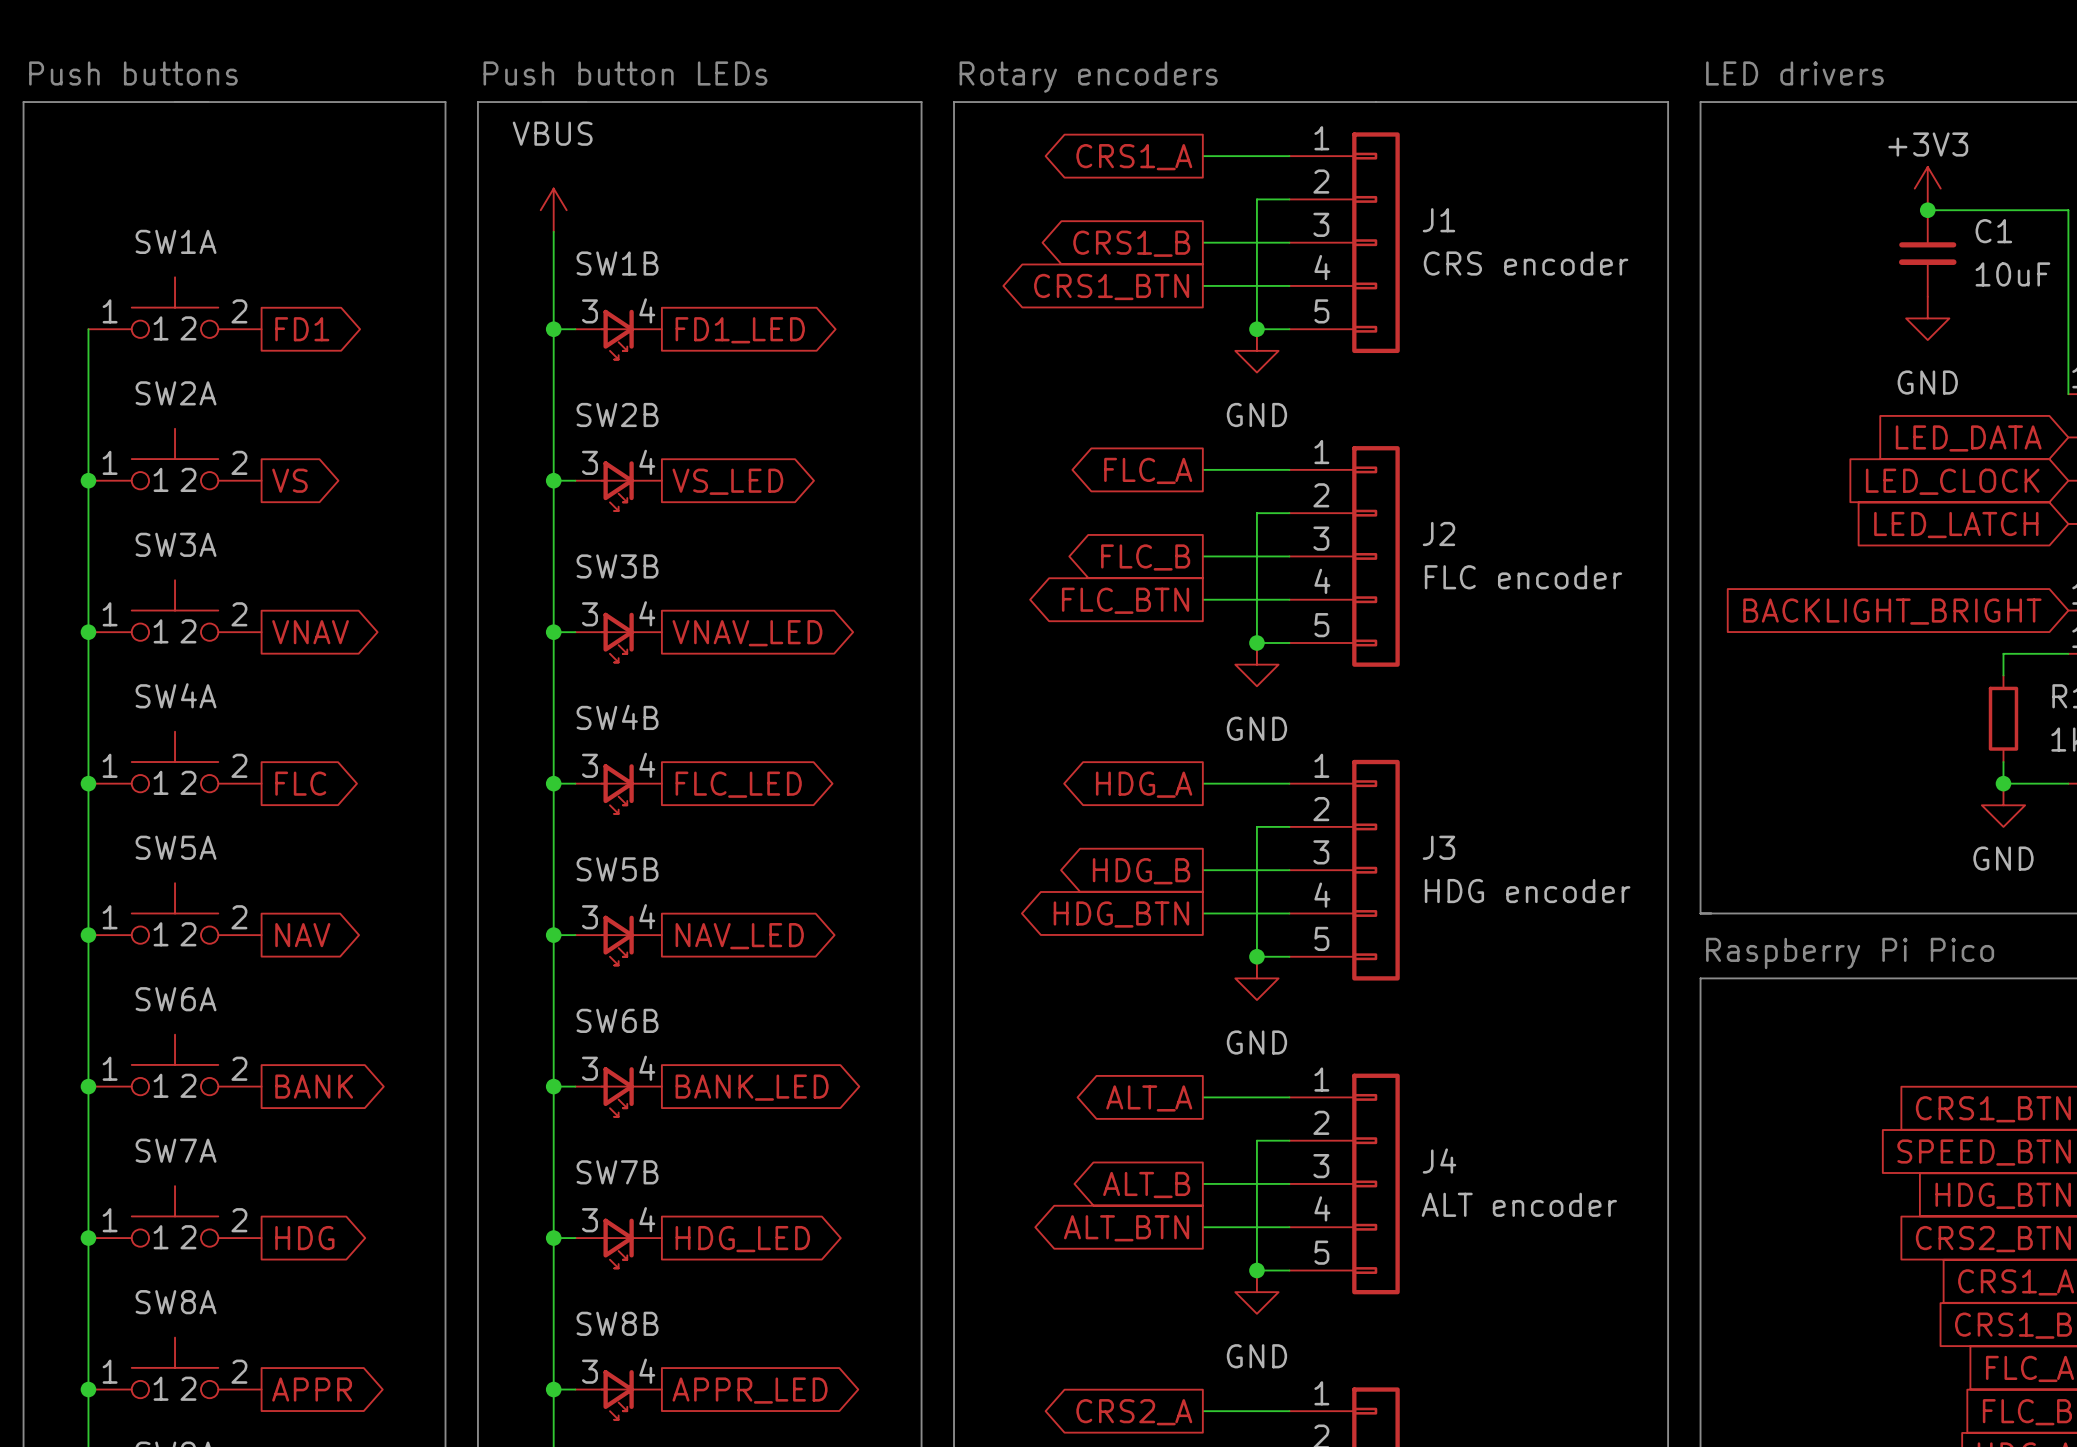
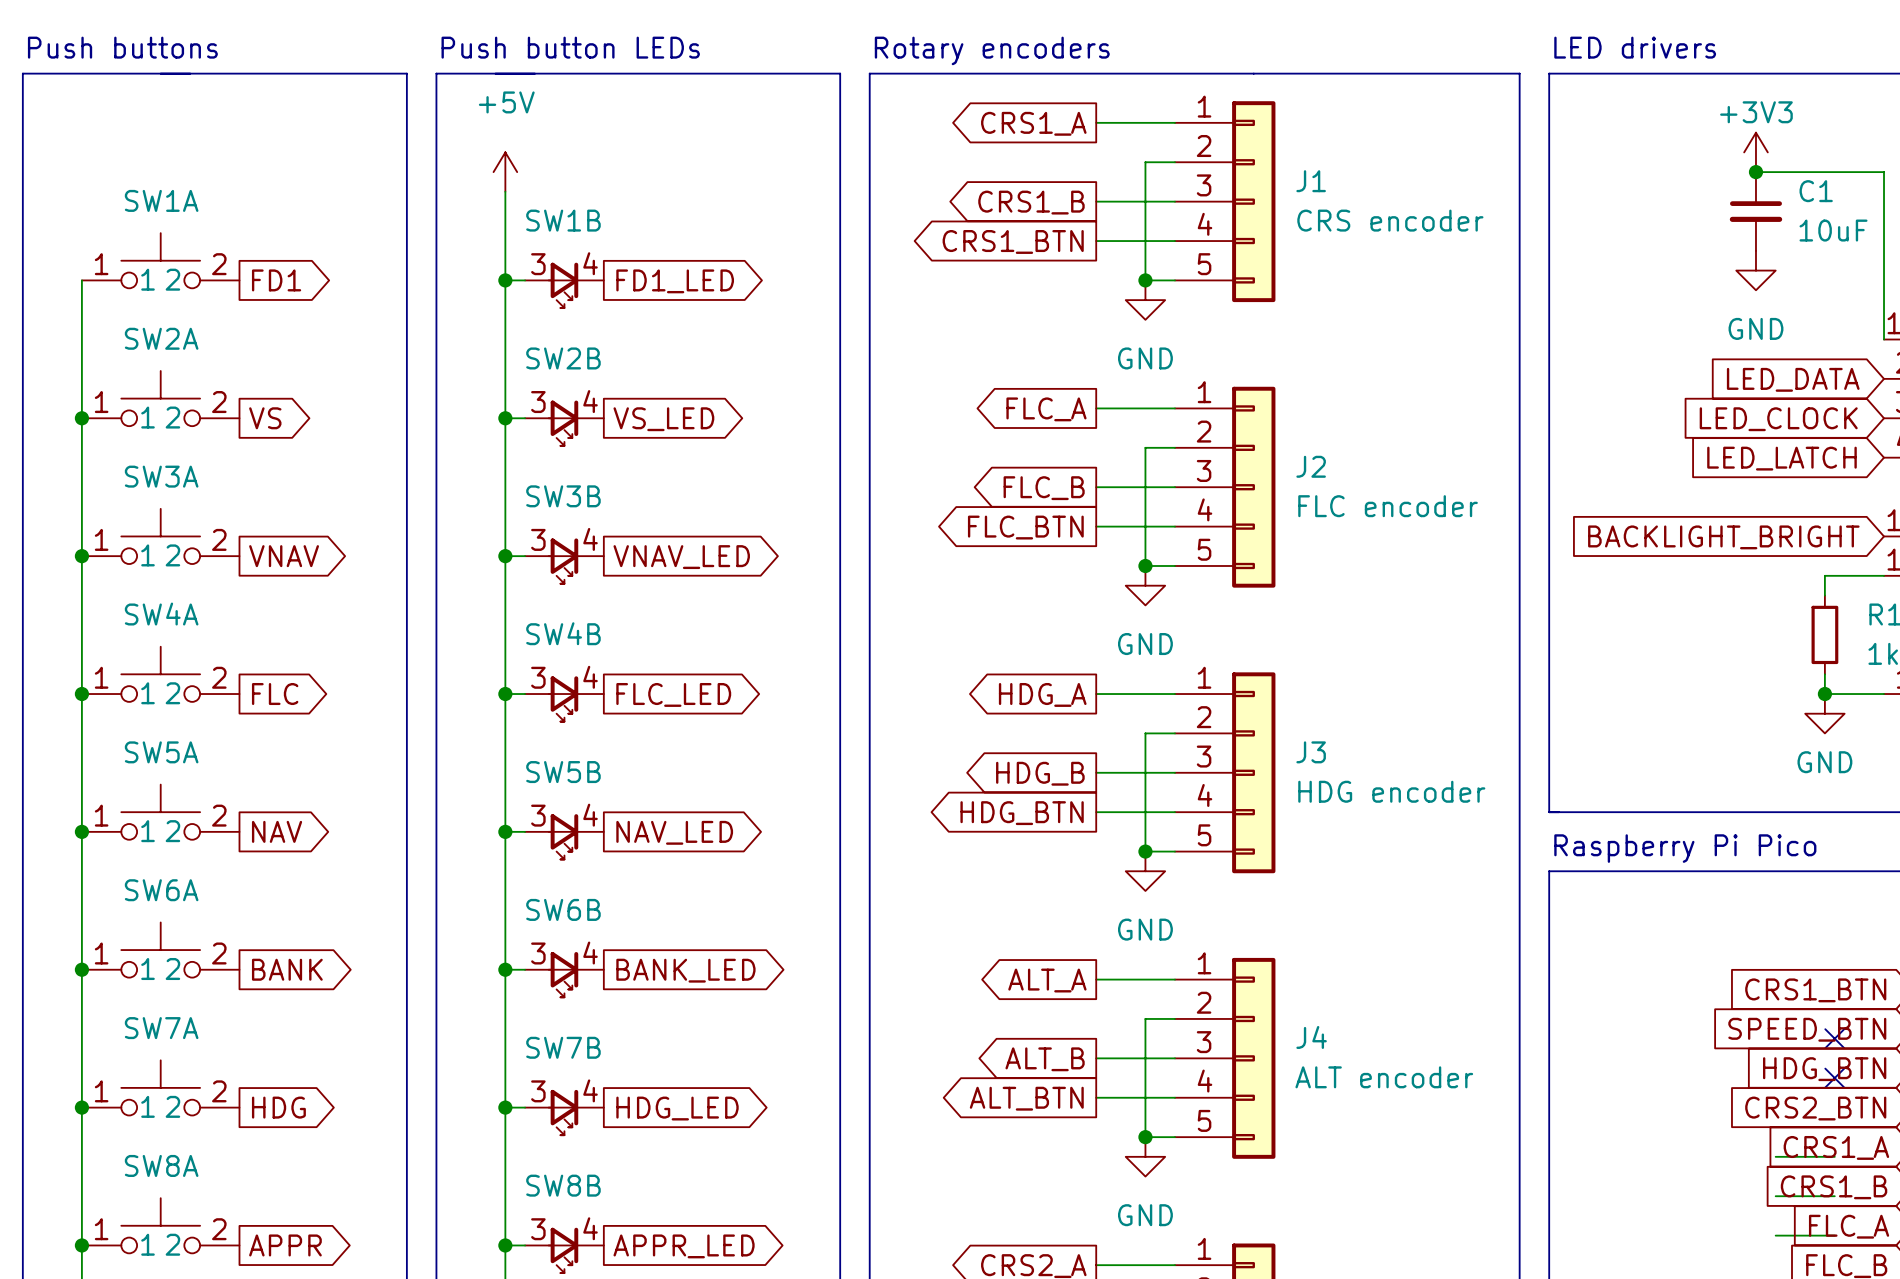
power symbol: VBUS (553, 210) -> +5V (505, 172)
no-connect mark: none -> (1834, 1038)
no-connect mark: none -> (1834, 1078)
wire: none -> (1775, 1156) (1834, 1156)
wire: none -> (1775, 1196) (1834, 1196)
wire: none -> (1775, 1235) (1834, 1235)

